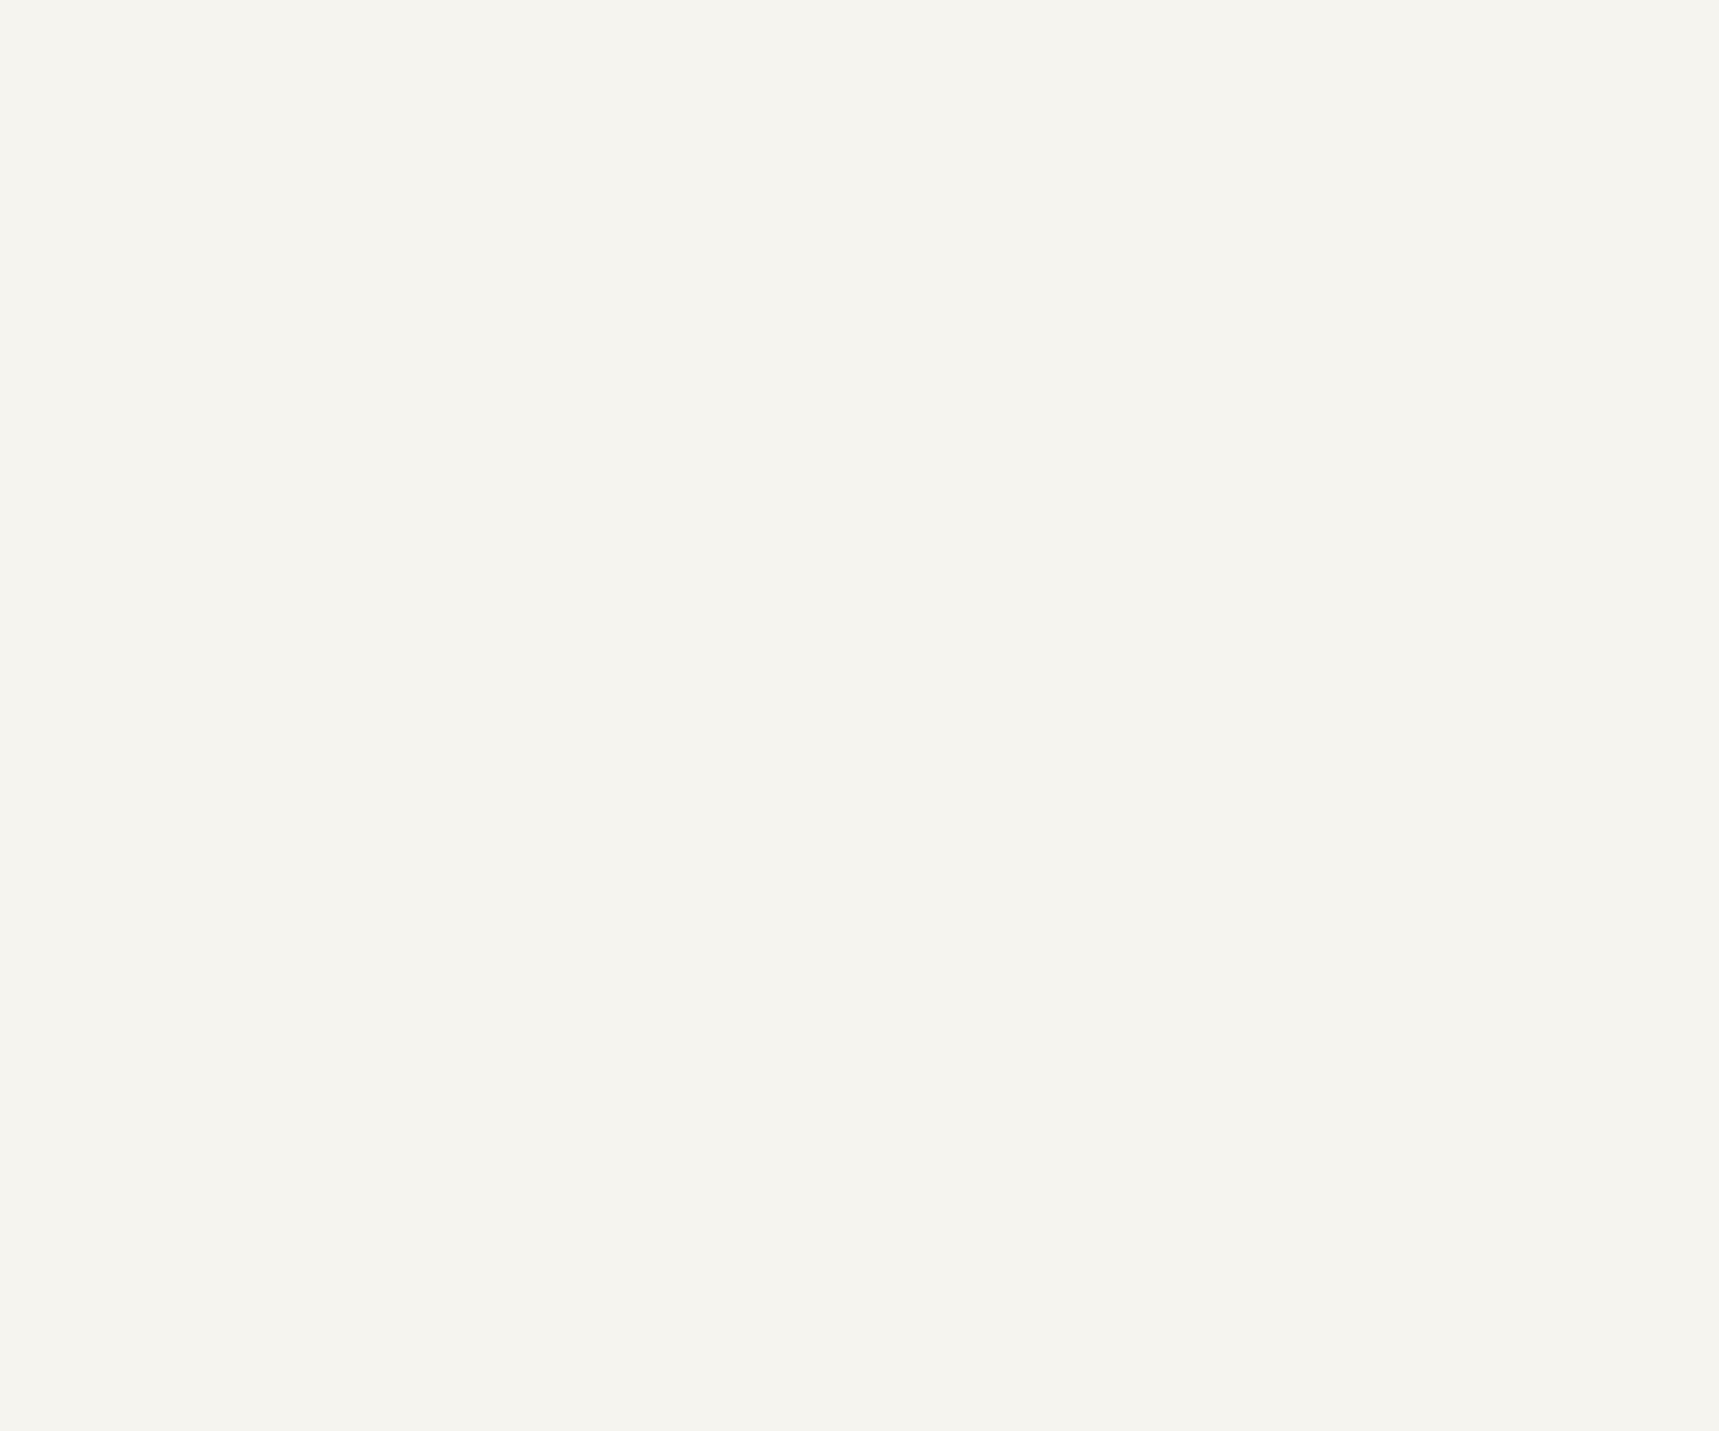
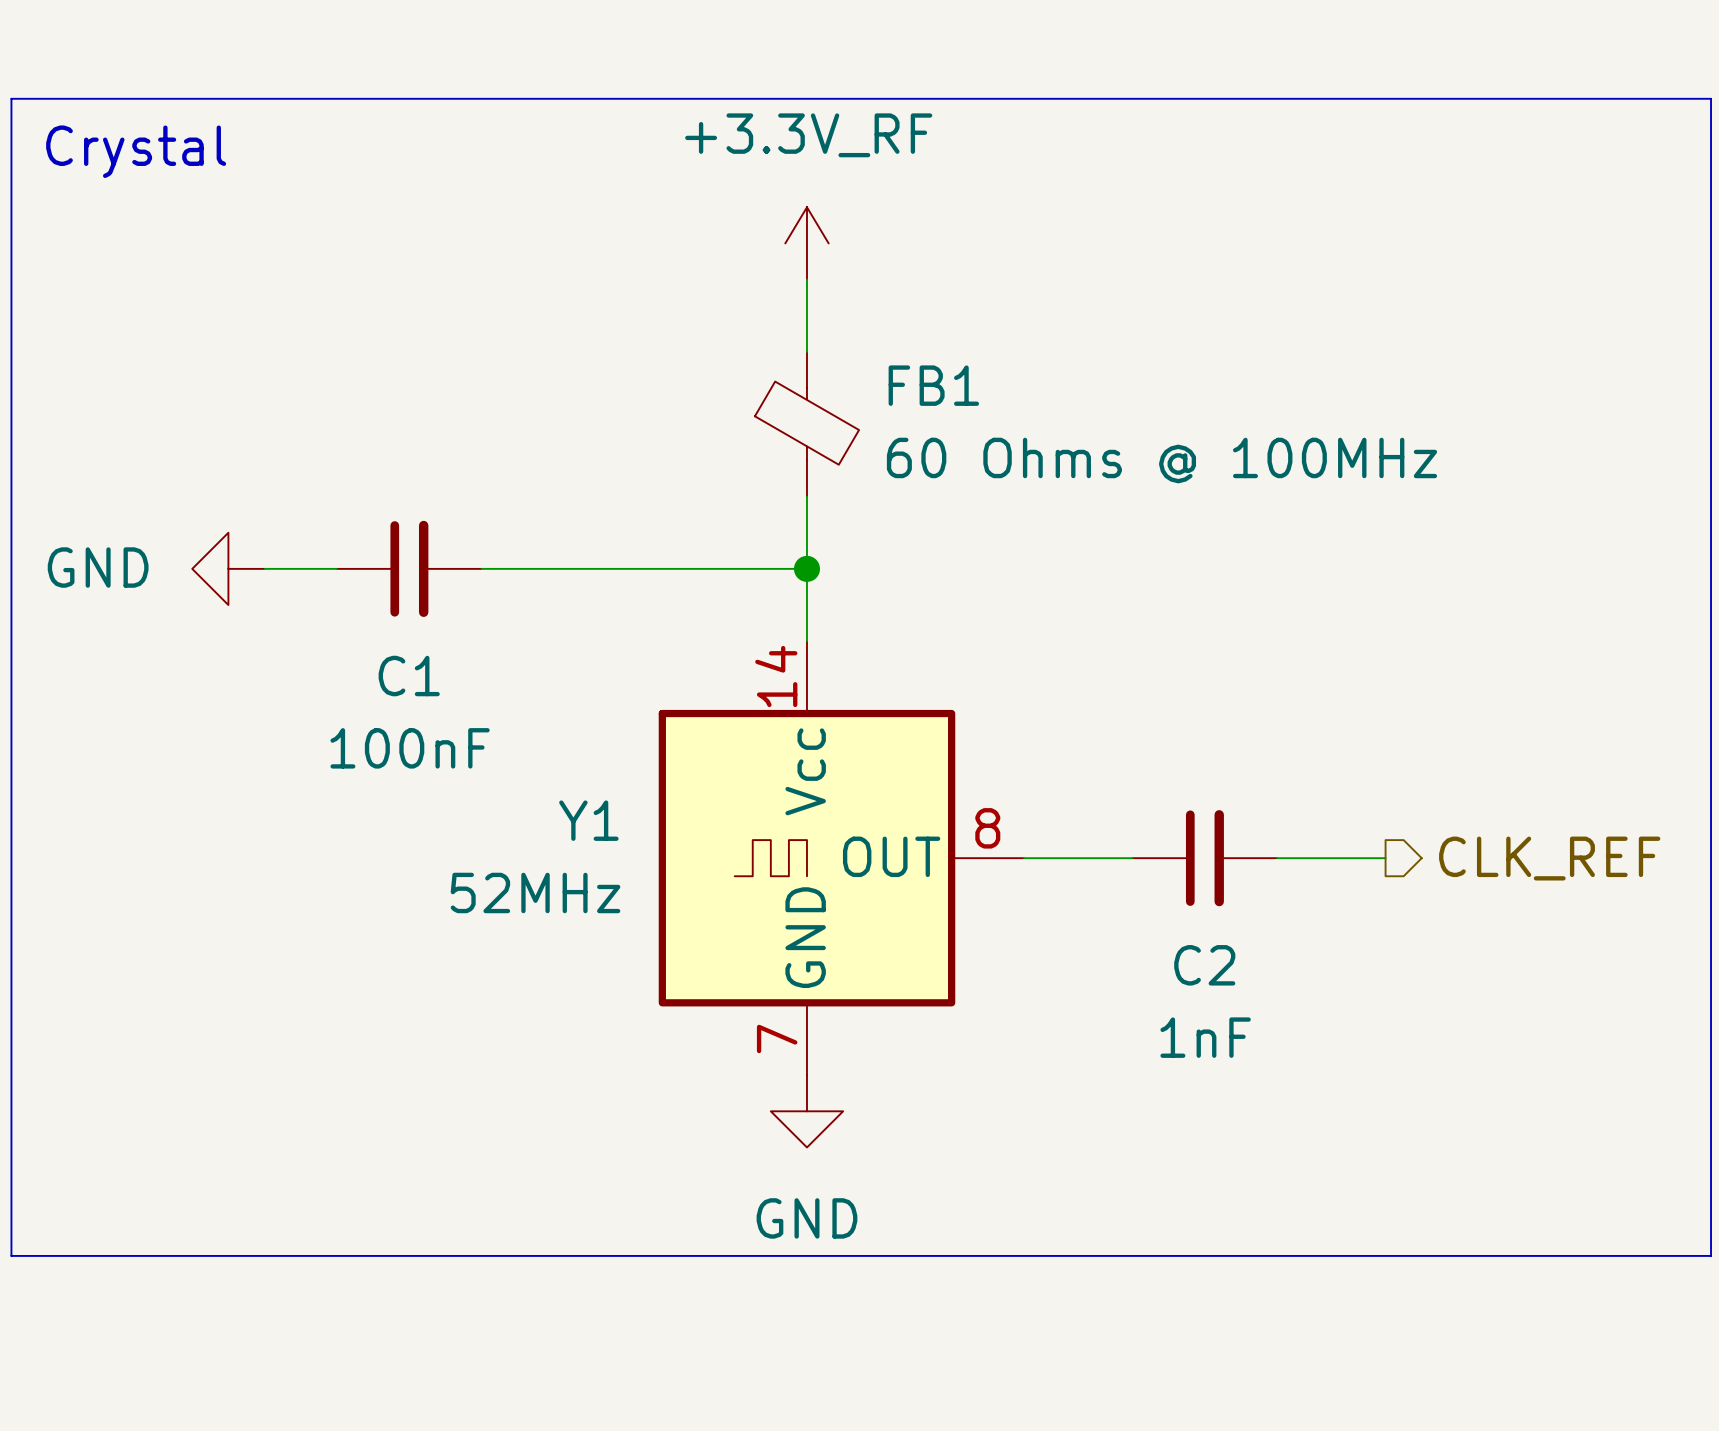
line: none -> (11, 98) (1711, 98) (1711, 1255) (11, 1255) (11, 98)
text: none -> Crystal (136, 151)
power symbol: none -> +3.3V_RF (806, 243)
wire: none -> (806, 279) (806, 351)
FB1: none -> 60 Ohms @ 100MHz (806, 424)
wire: none -> (806, 496) (806, 641)
power symbol: none -> GND (228, 568)
wire: none -> (264, 568) (336, 568)
C1: none -> 100nF (409, 568)
wire: none -> (481, 568) (806, 568)
junction: none -> (806, 568)
Y1: none -> 52MHz (841, 858)
wire: none -> (1023, 858) (1132, 858)
C2: none -> 1nF (1204, 858)
wire: none -> (1277, 858) (1385, 858)
hierarchical label: none -> CLK_REF (1549, 858)
power symbol: none -> GND (806, 1111)

